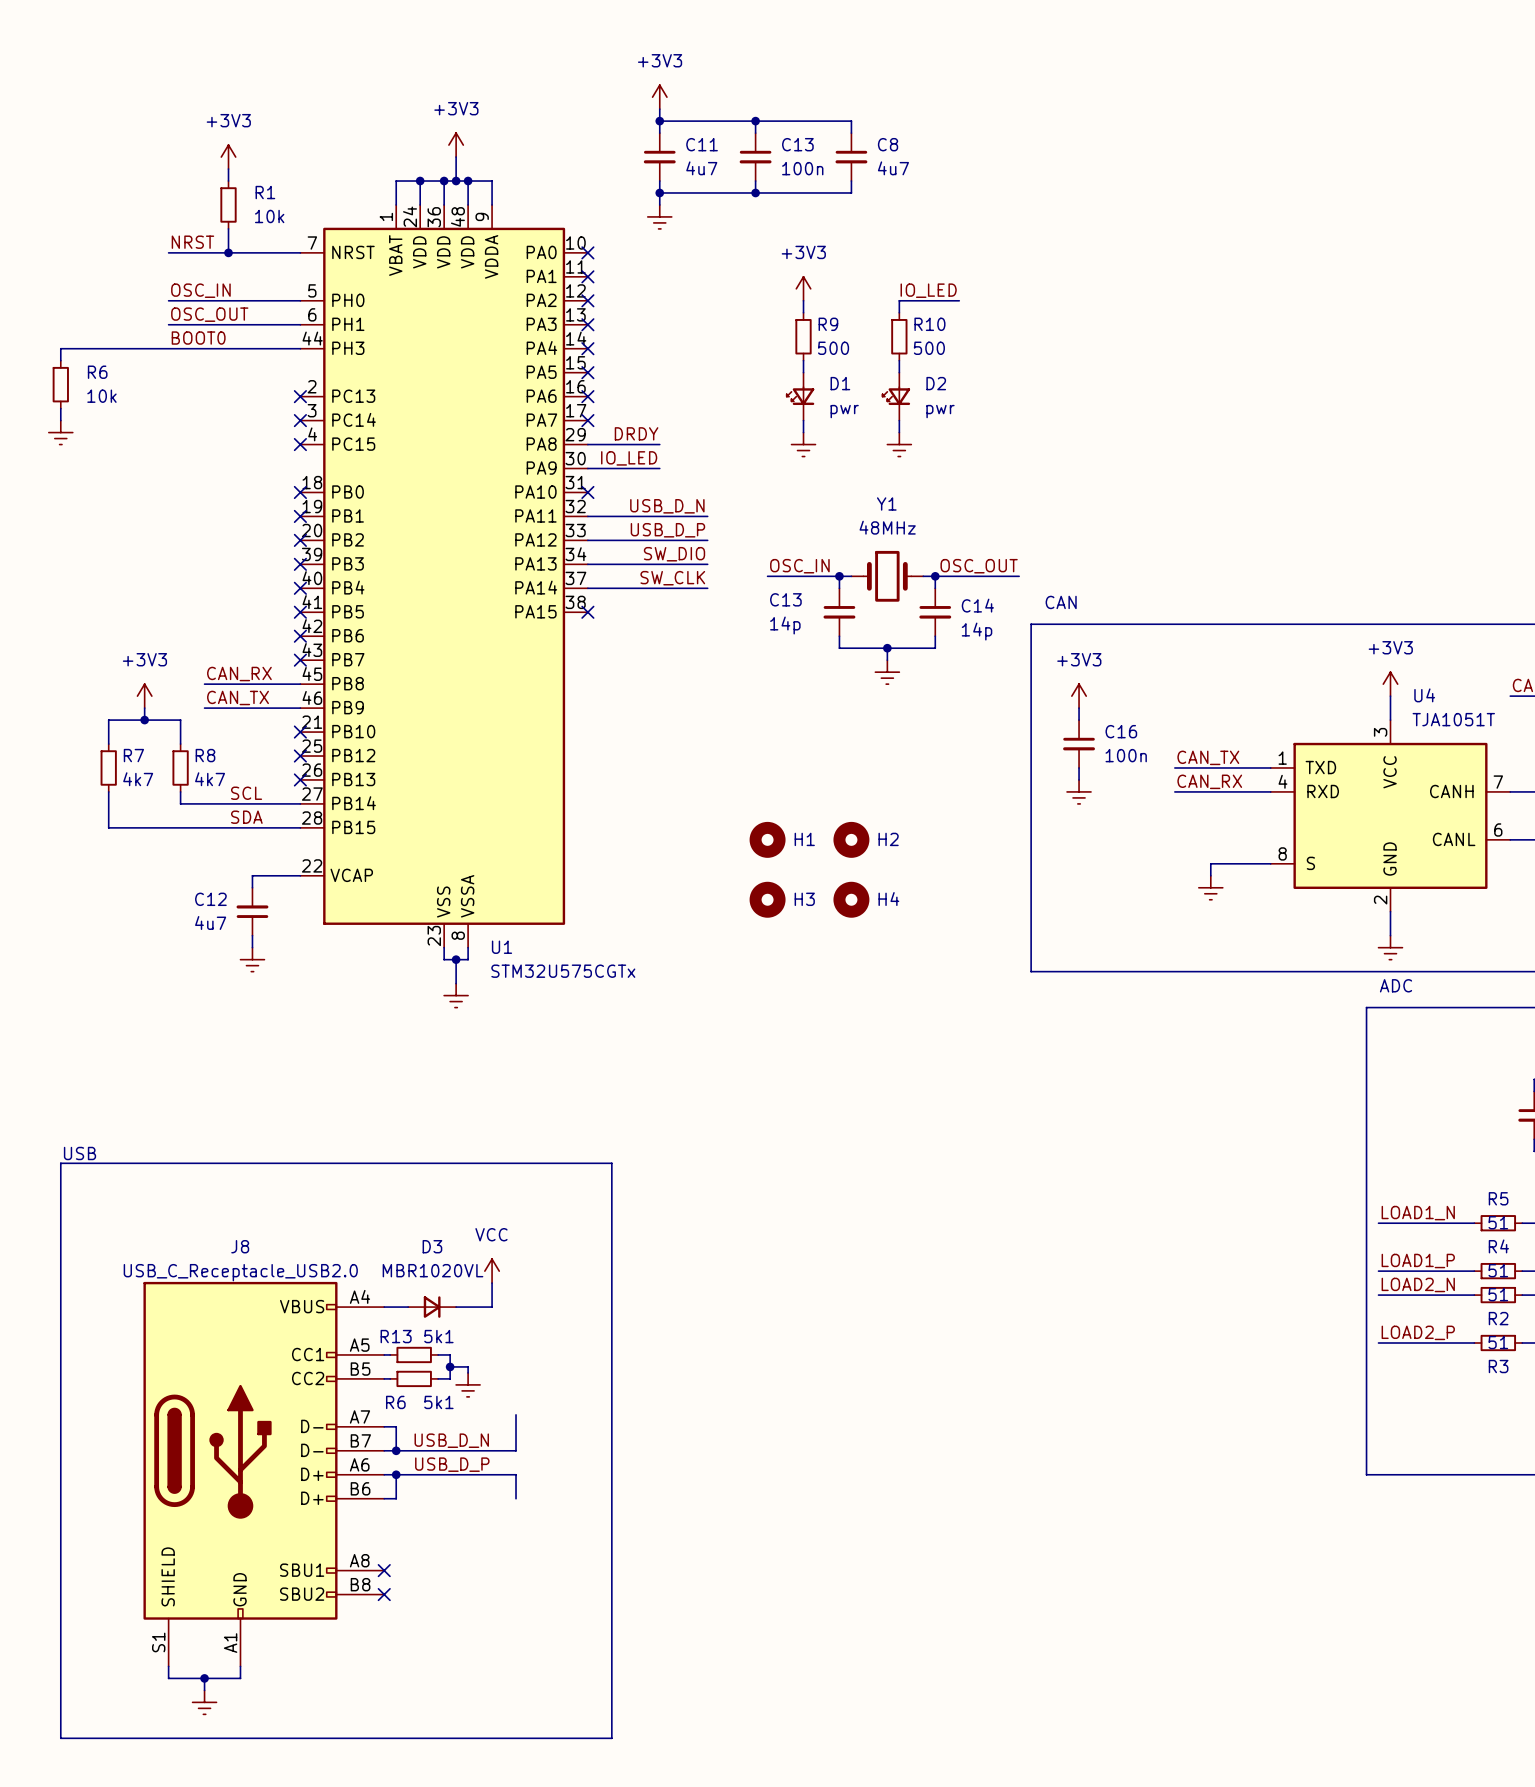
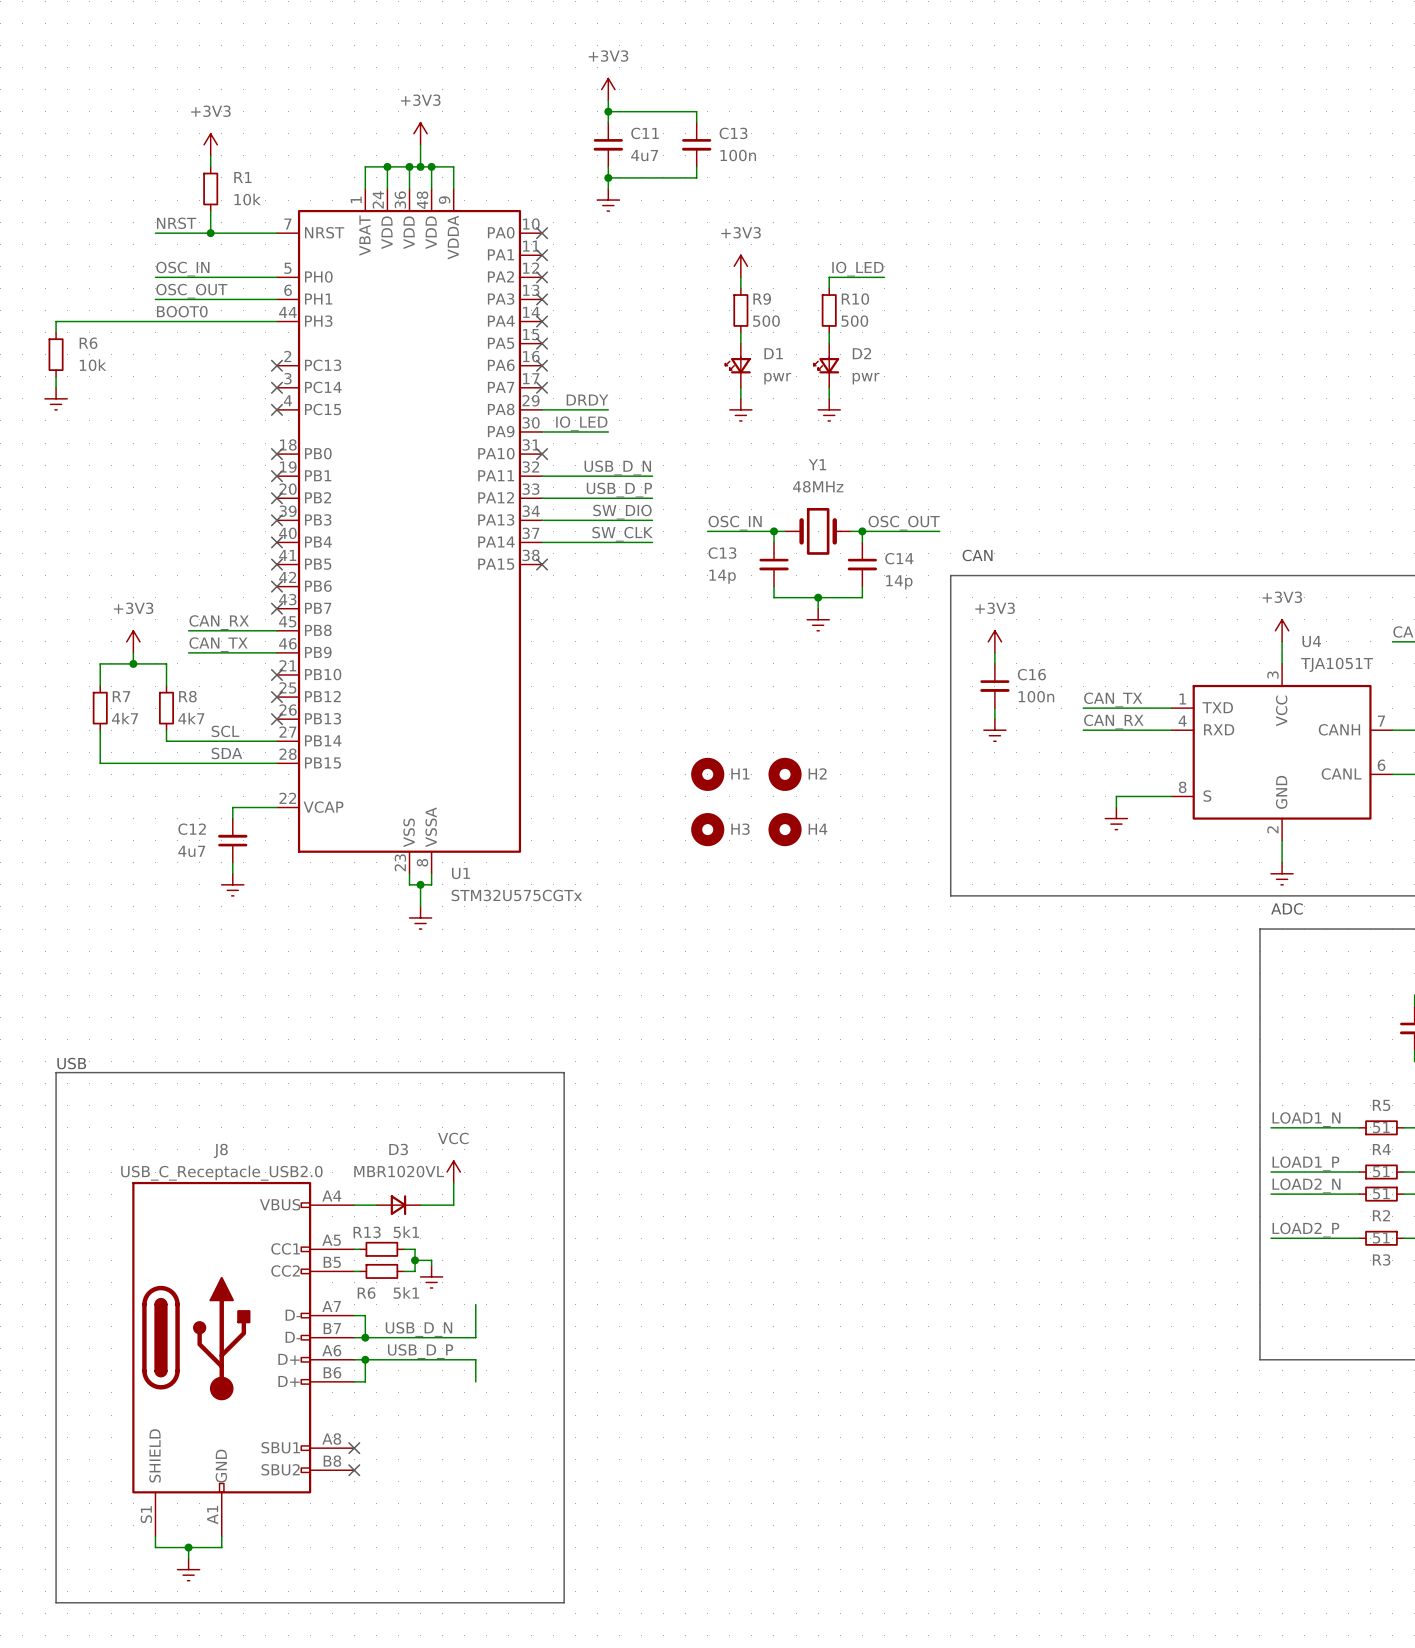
wire: (755, 121) (851, 121) (851, 133) -> none
junction: (755, 121) -> none
C8: 4u7 (851, 157) -> none
wire: (851, 181) (851, 192) (755, 192) -> none
junction: (755, 192) -> none

